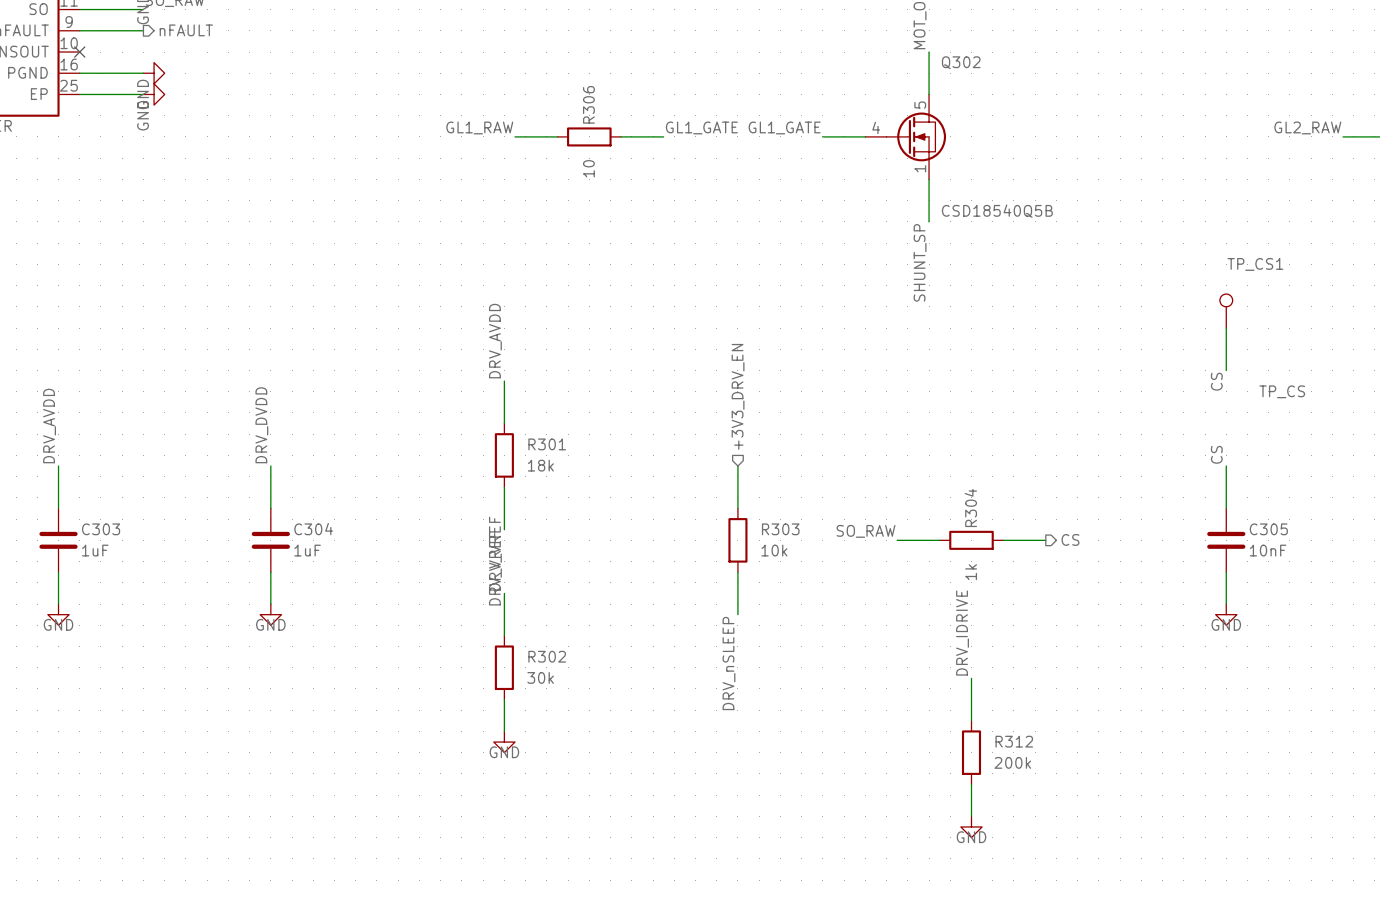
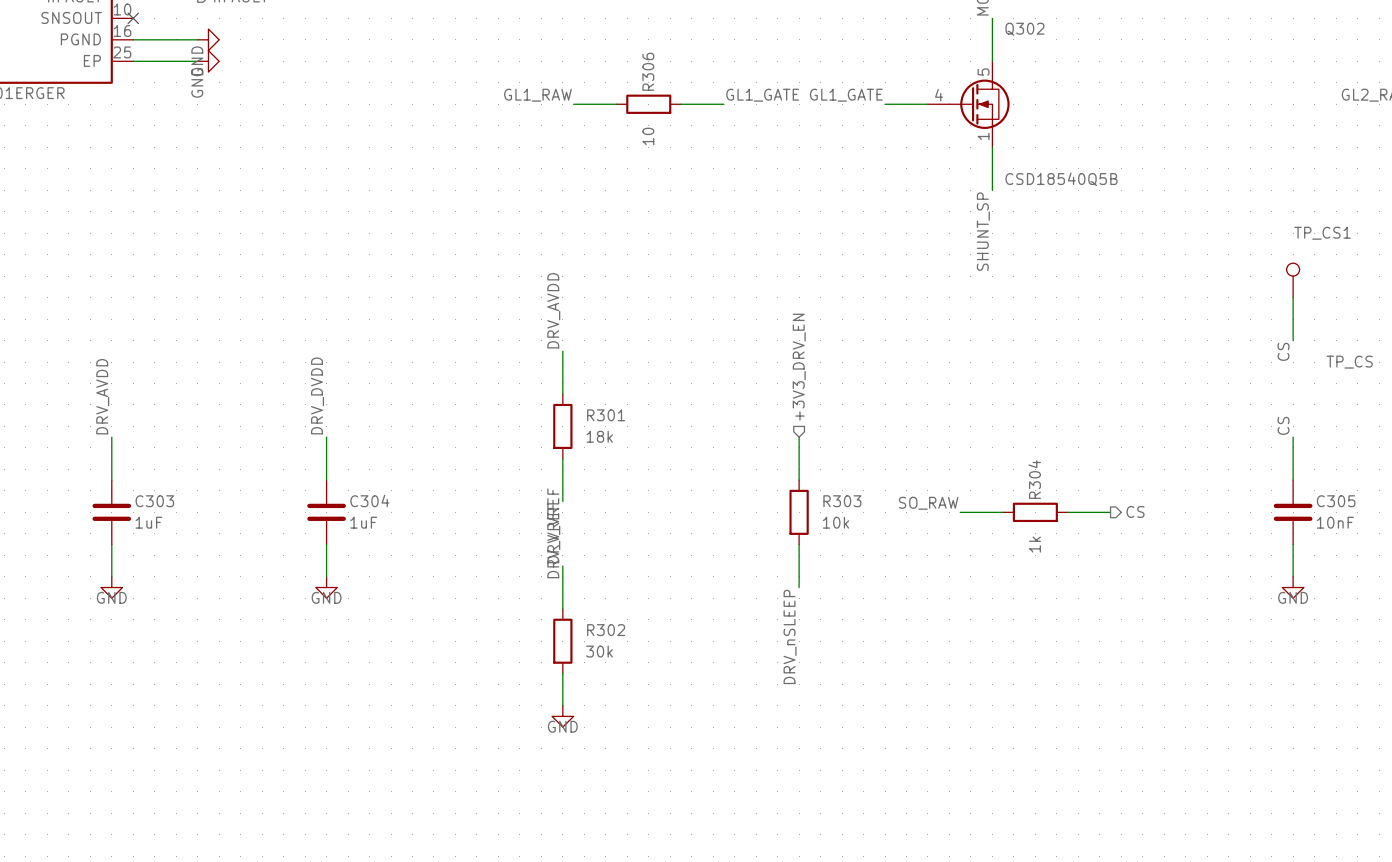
label: DRV_IDRIVE (962, 633) -> none
wire: (971, 678) (971, 720) -> none
R312: 200k (971, 752) -> none
wire: (971, 784) (971, 816) -> none
power symbol: GND (971, 826) -> none

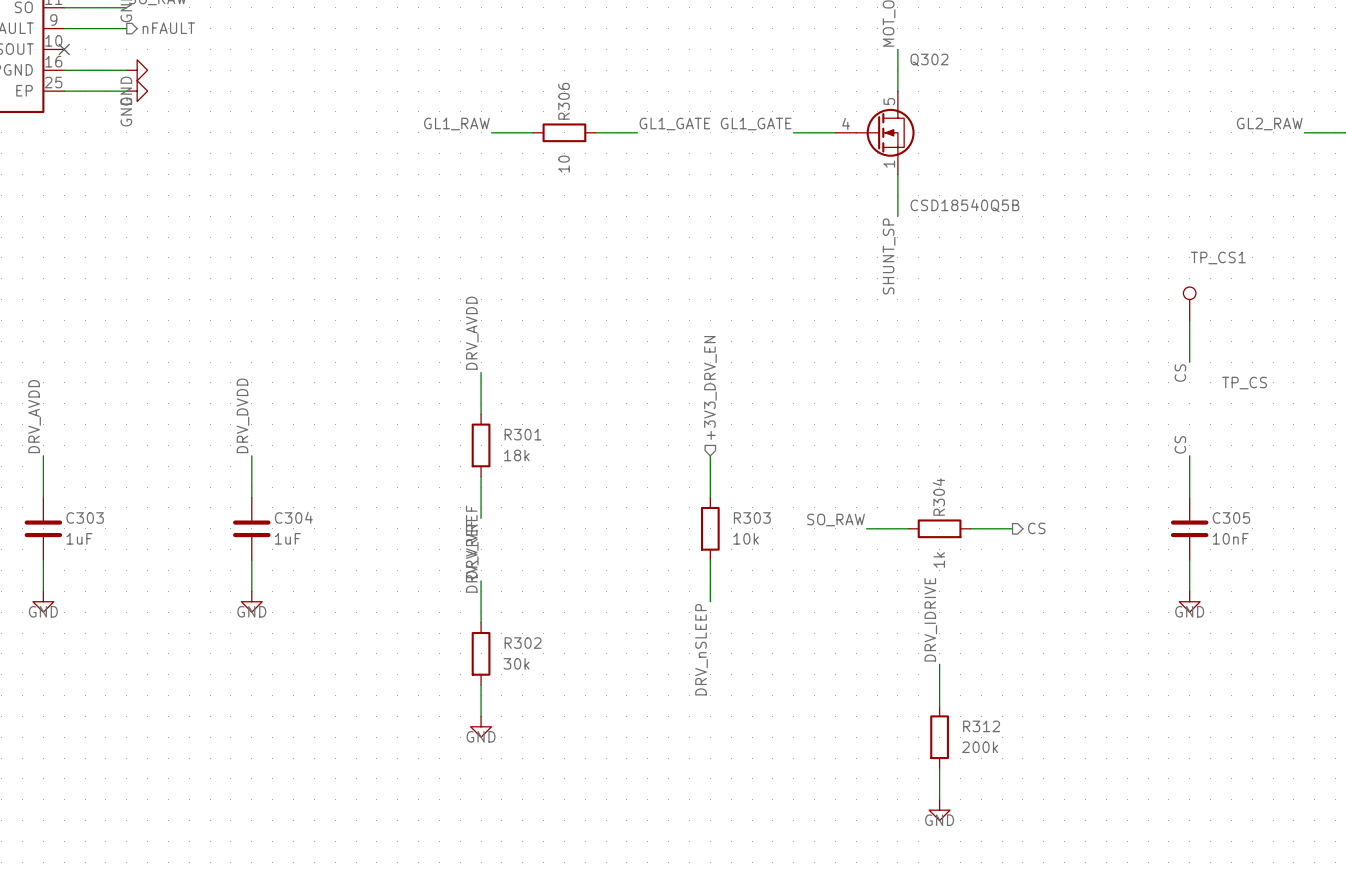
label: none -> DRV_IDRIVE (930, 619)
wire: none -> (939, 664) (939, 705)
R312: none -> 200k (939, 737)
wire: none -> (939, 768) (939, 799)
power symbol: none -> GND (939, 810)

